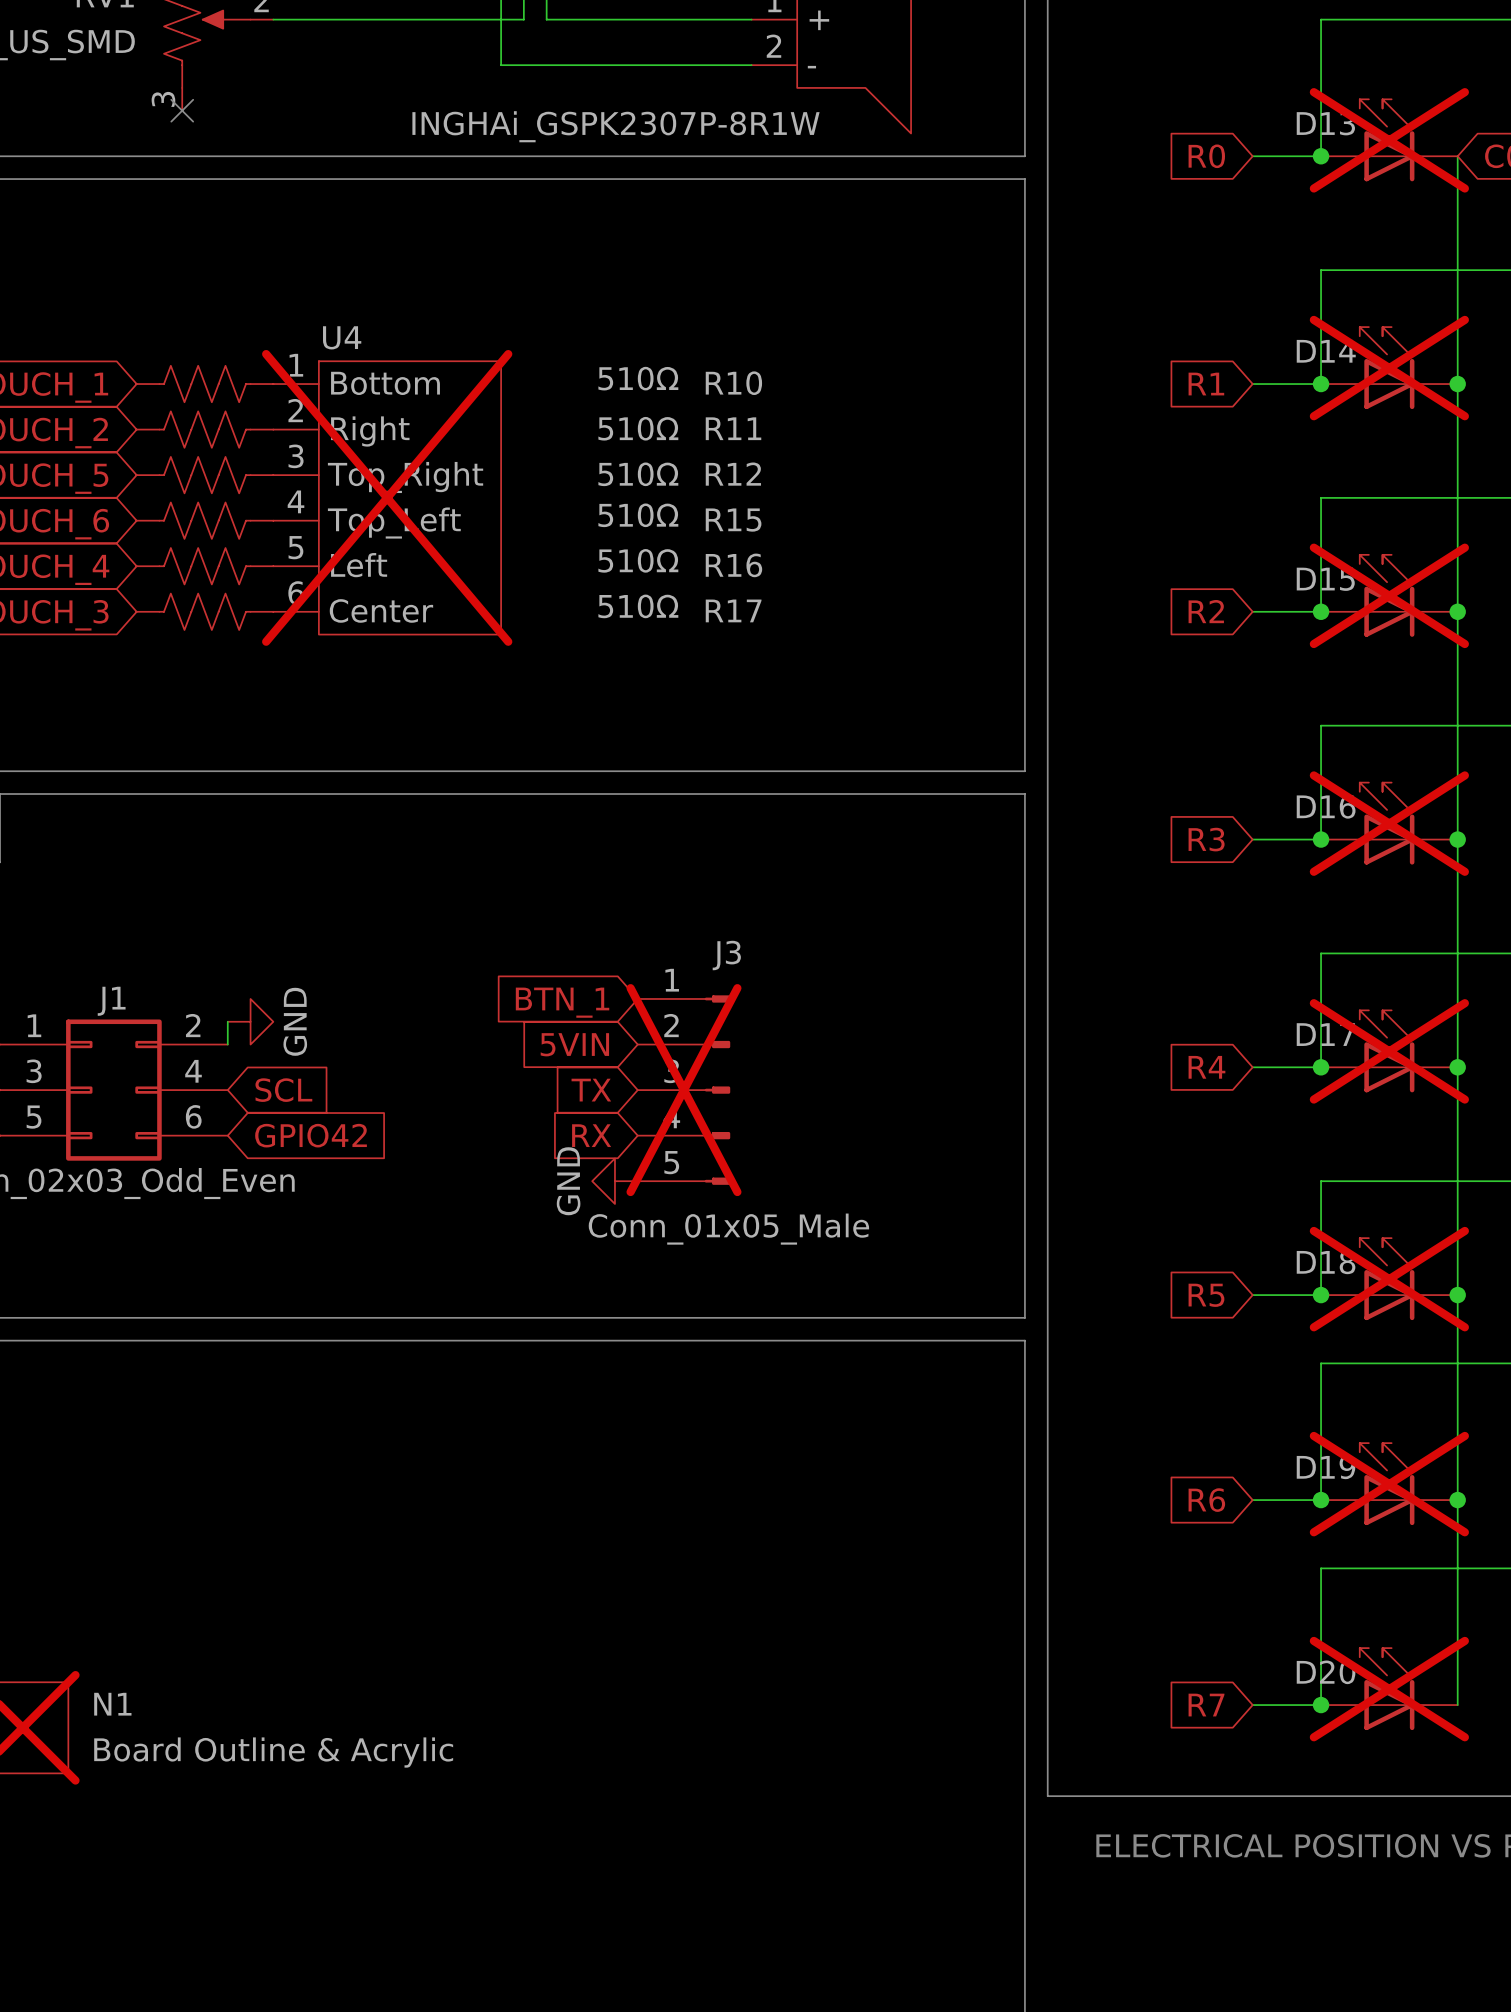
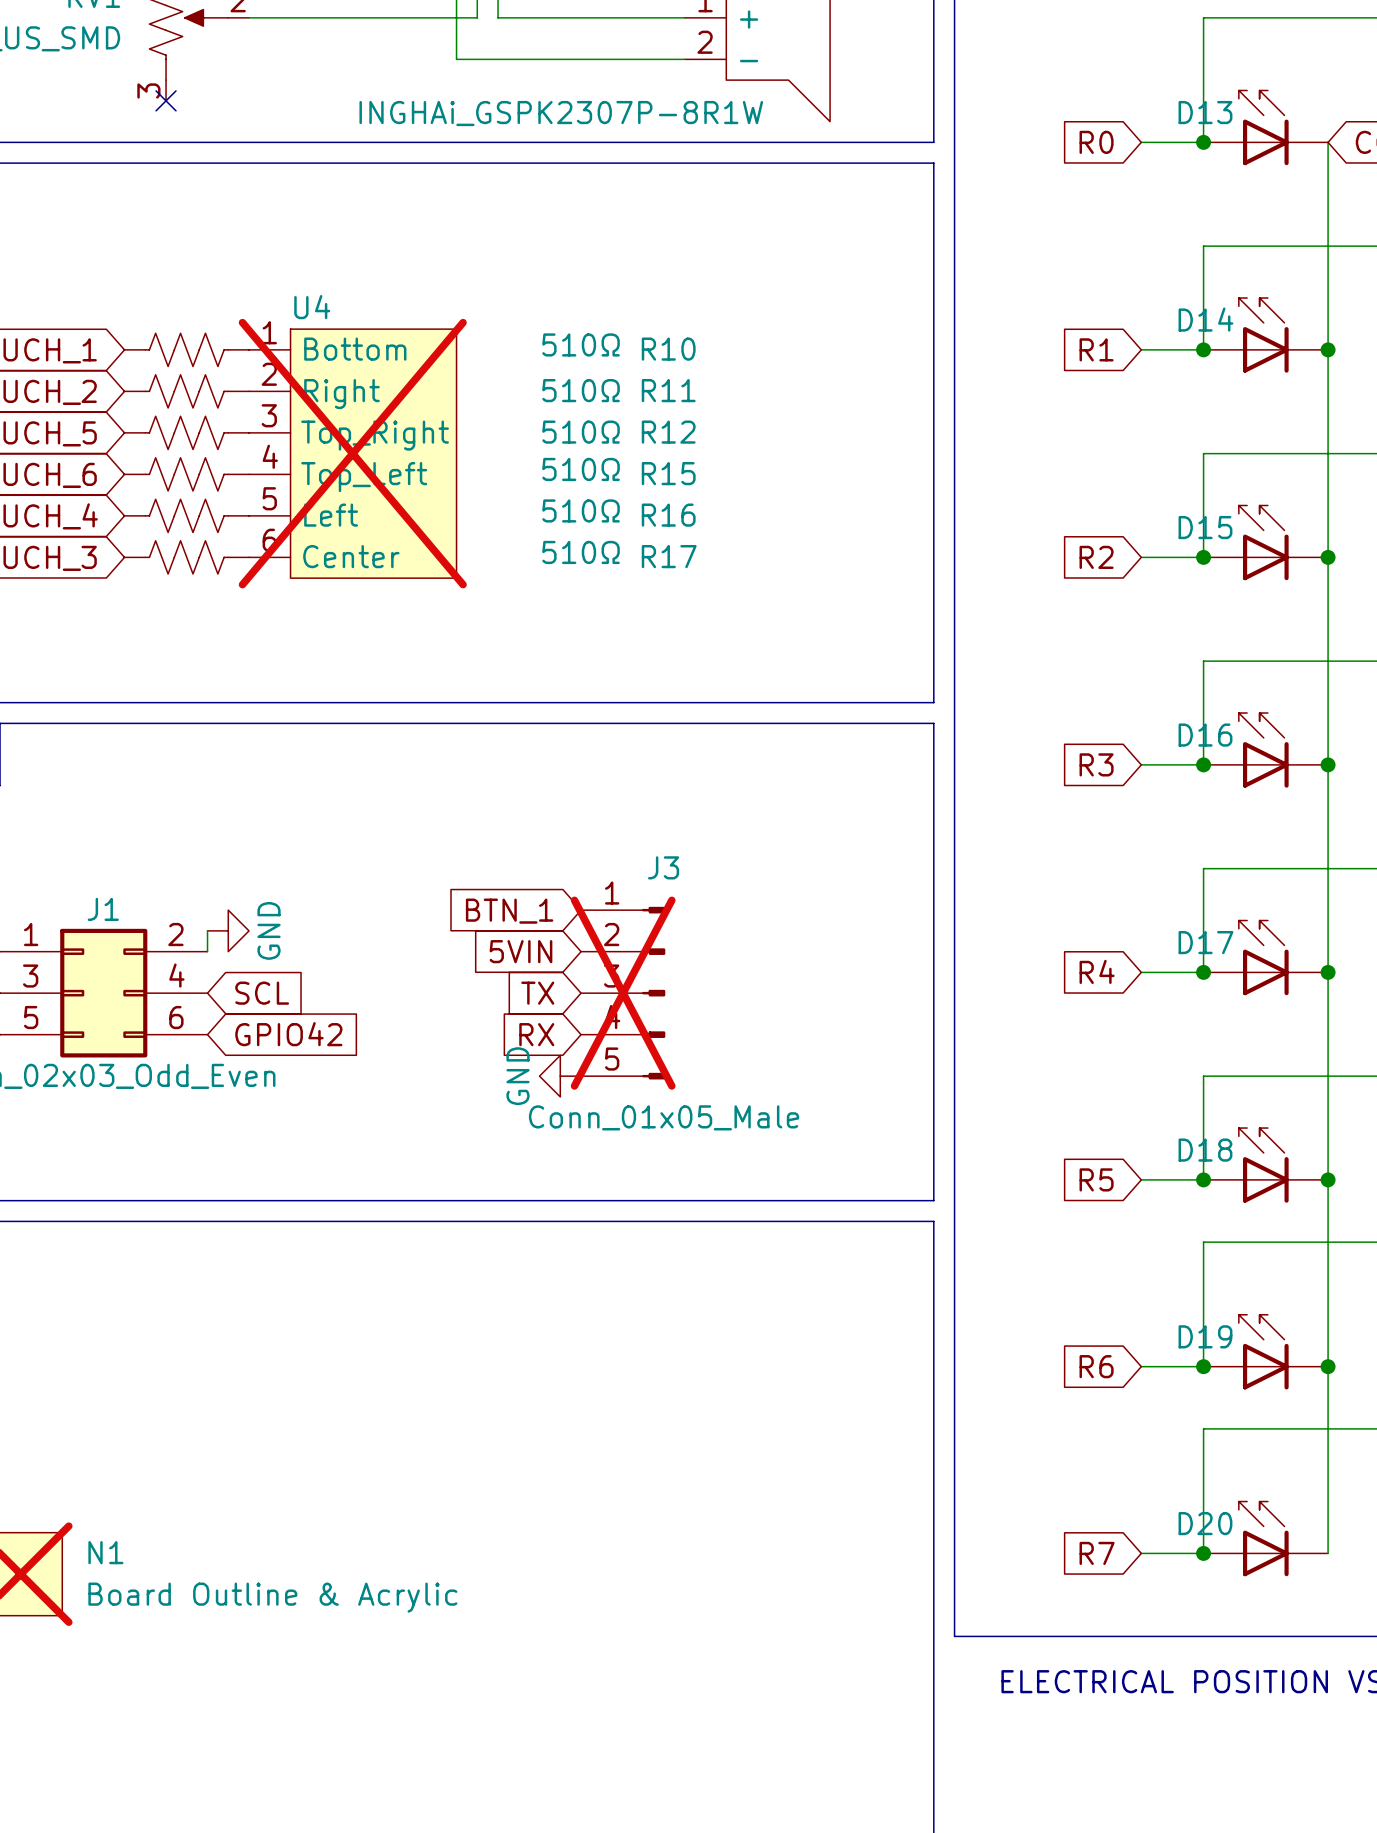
D13 do-not-place cross: (1389, 140) -> none
D14 do-not-place cross: (1389, 368) -> none
D15 do-not-place cross: (1389, 595) -> none
D16 do-not-place cross: (1389, 823) -> none
D17 do-not-place cross: (1389, 1051) -> none
D18 do-not-place cross: (1389, 1279) -> none
D19 do-not-place cross: (1389, 1484) -> none
D20 do-not-place cross: (1389, 1689) -> none

